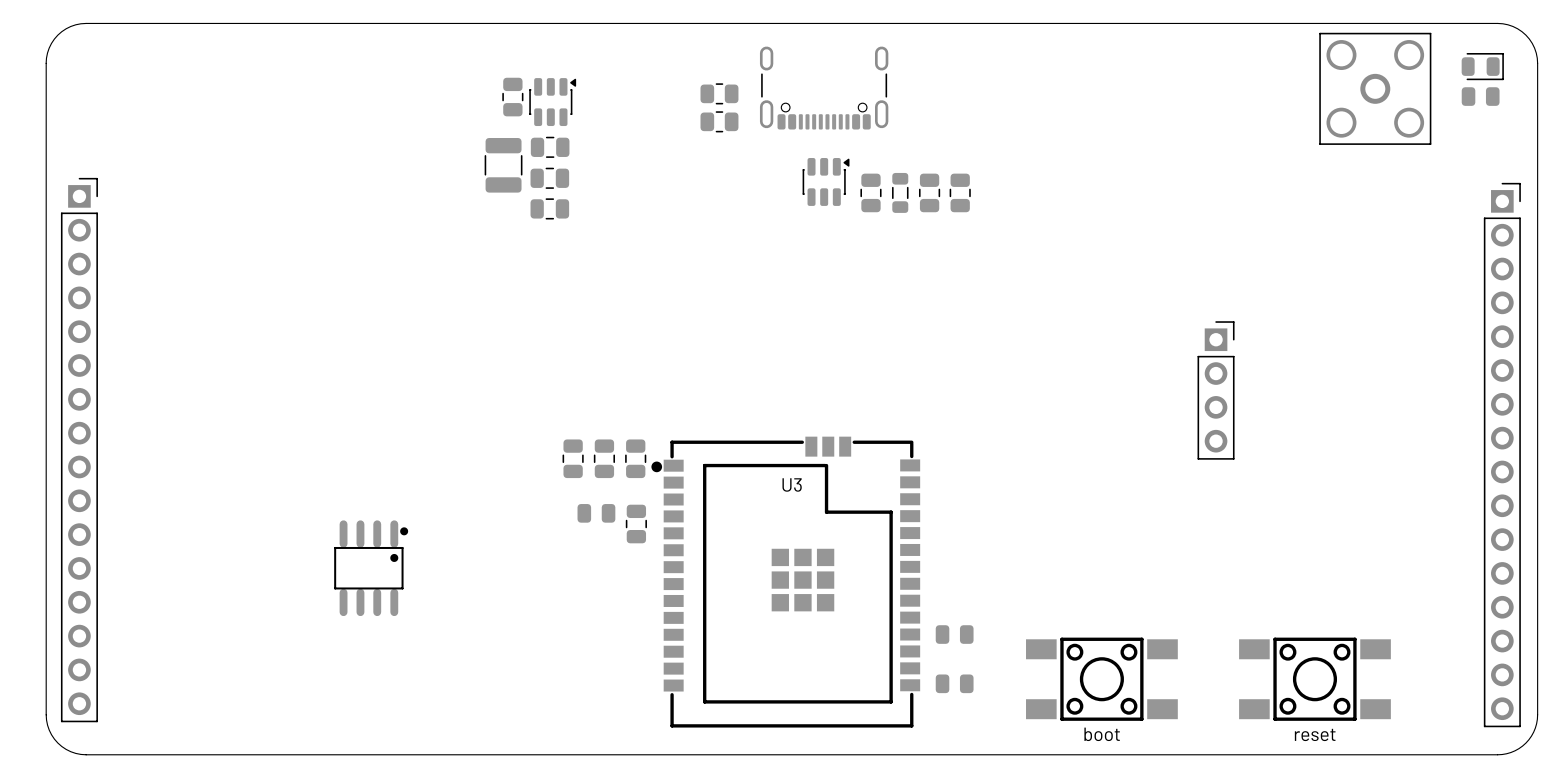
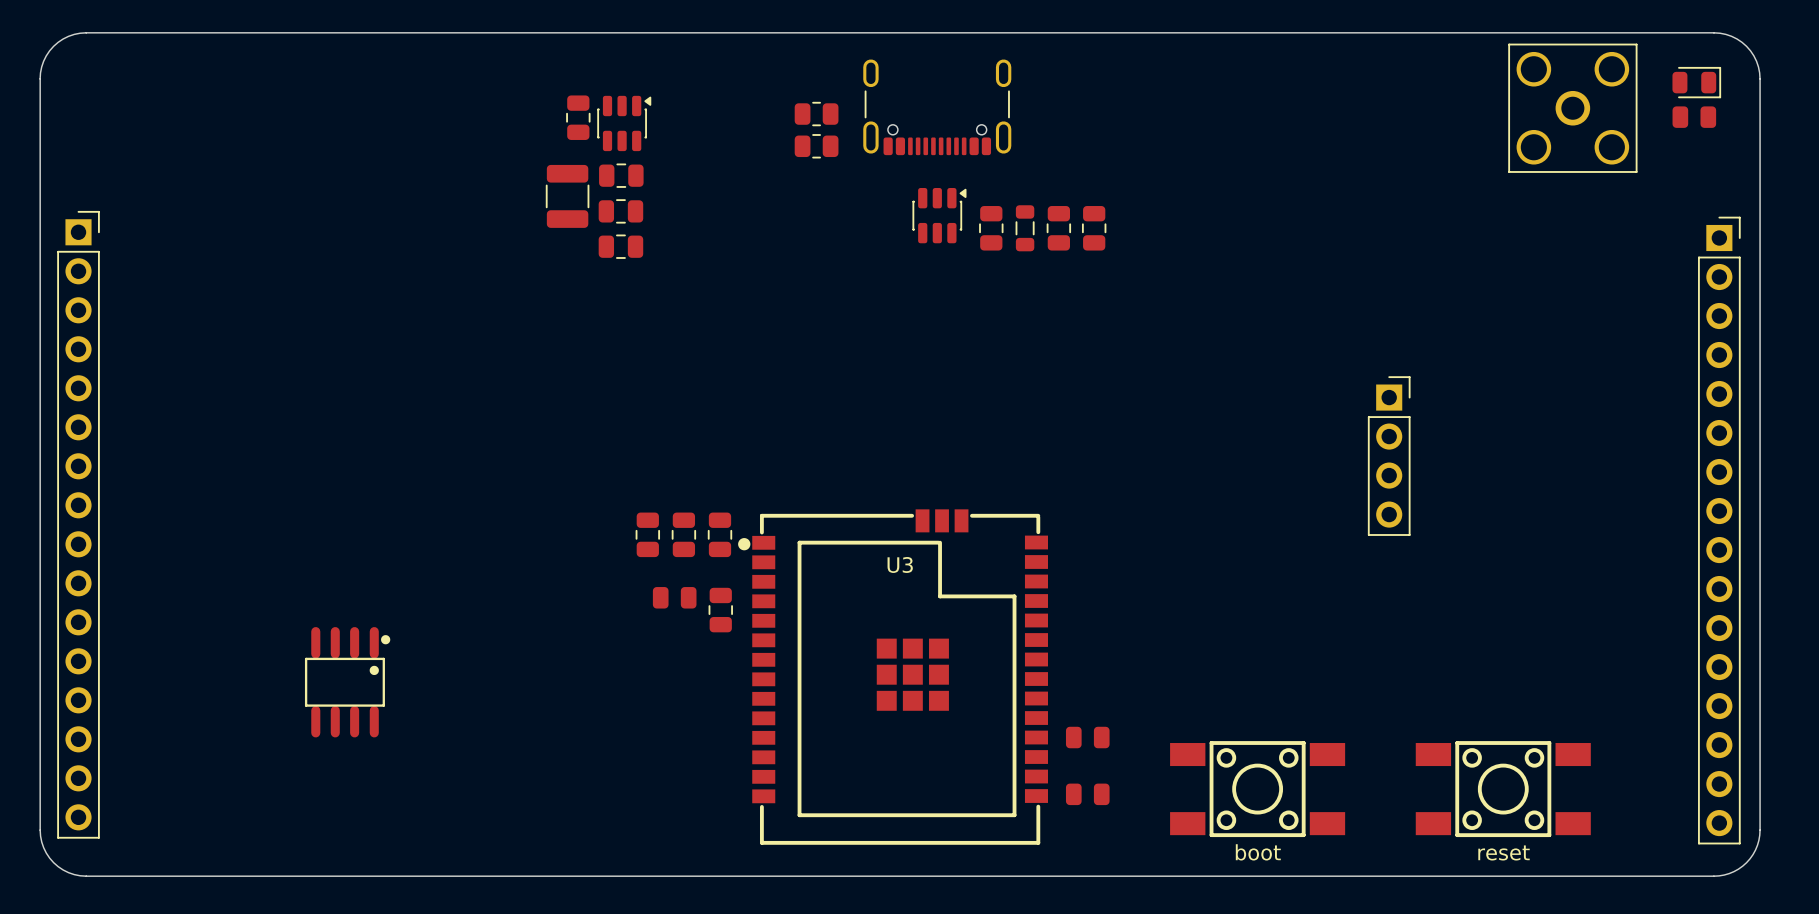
part position: (371, 568) -> (347, 682)

